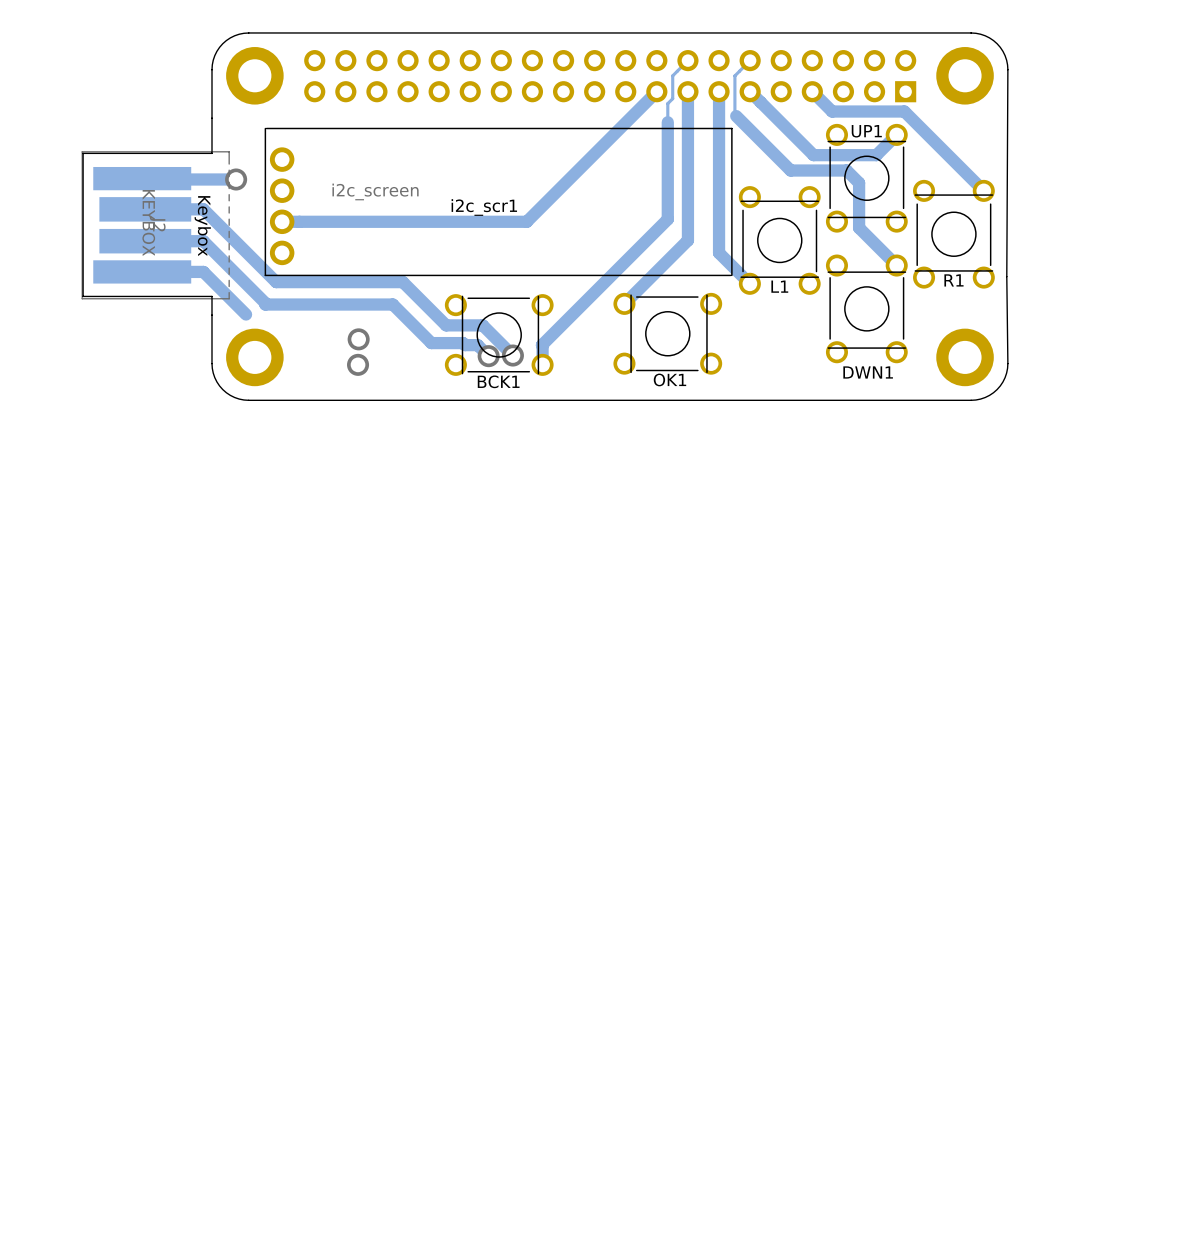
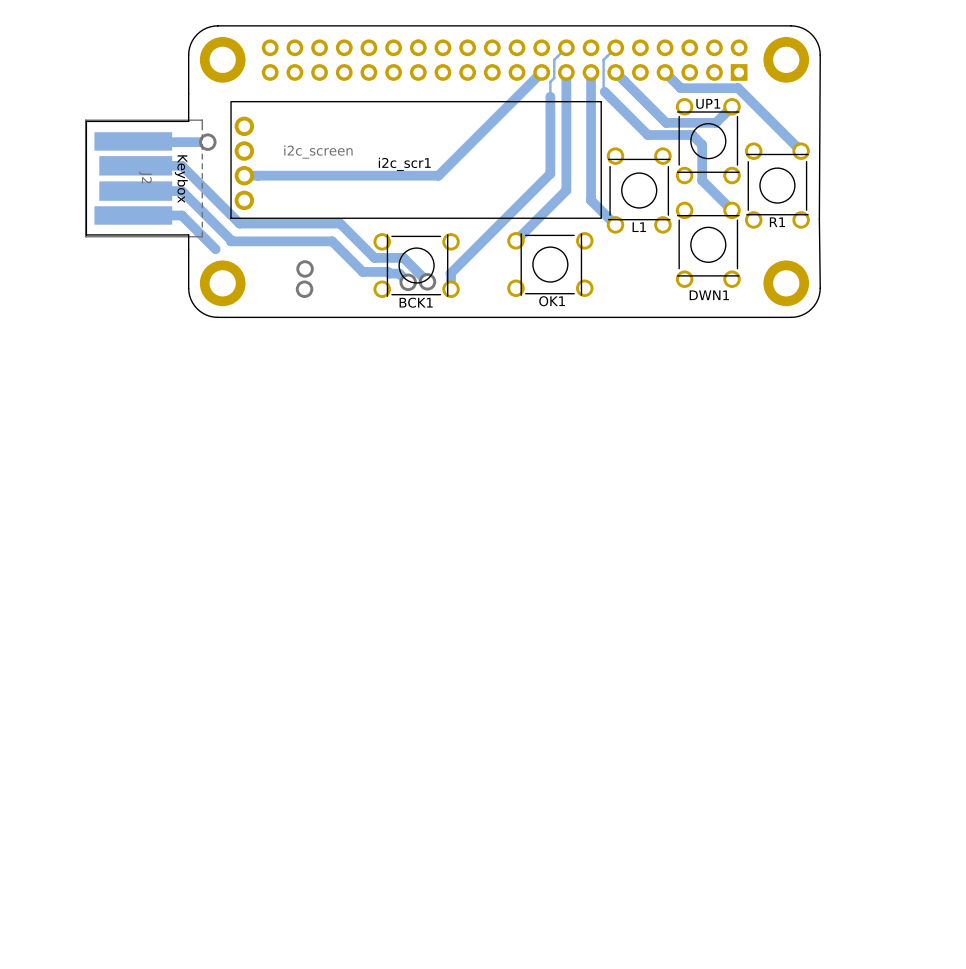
drawing: [142, 190, 156, 256] -> none

